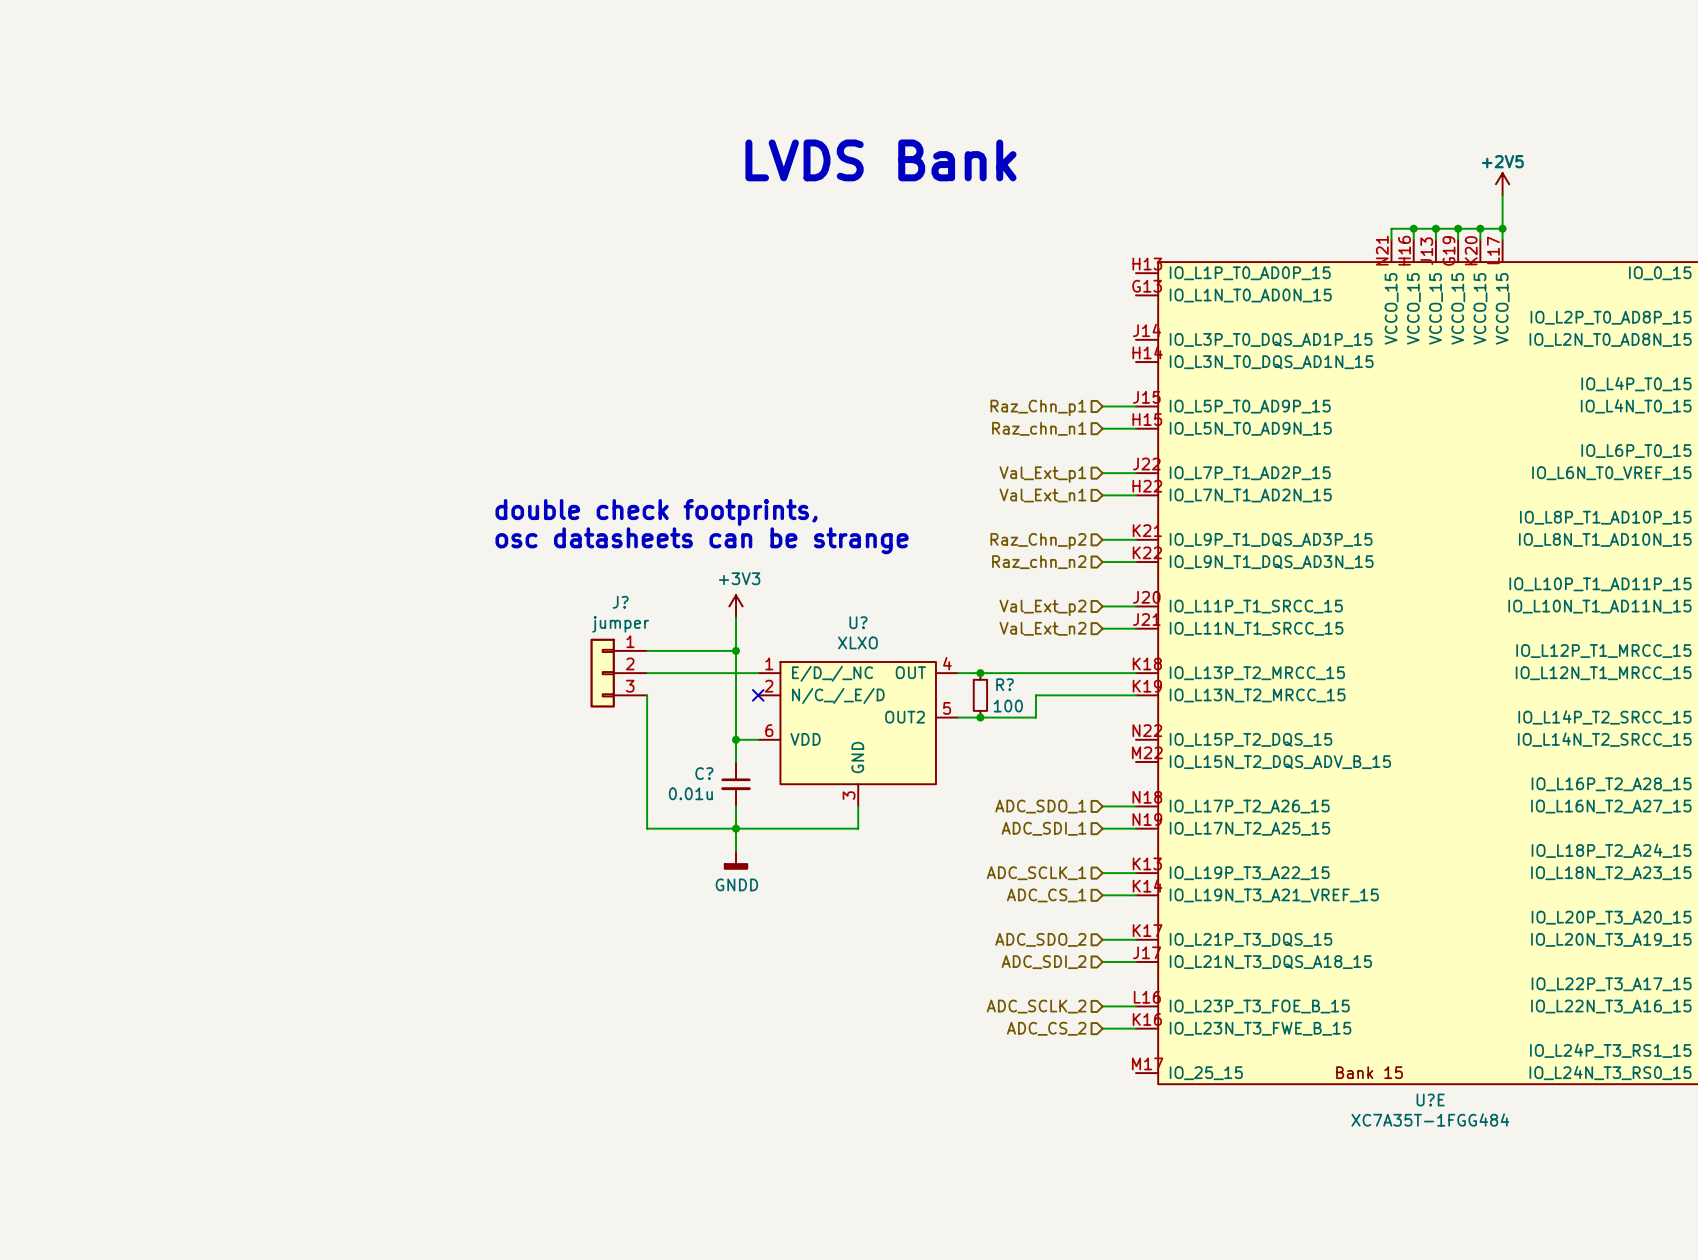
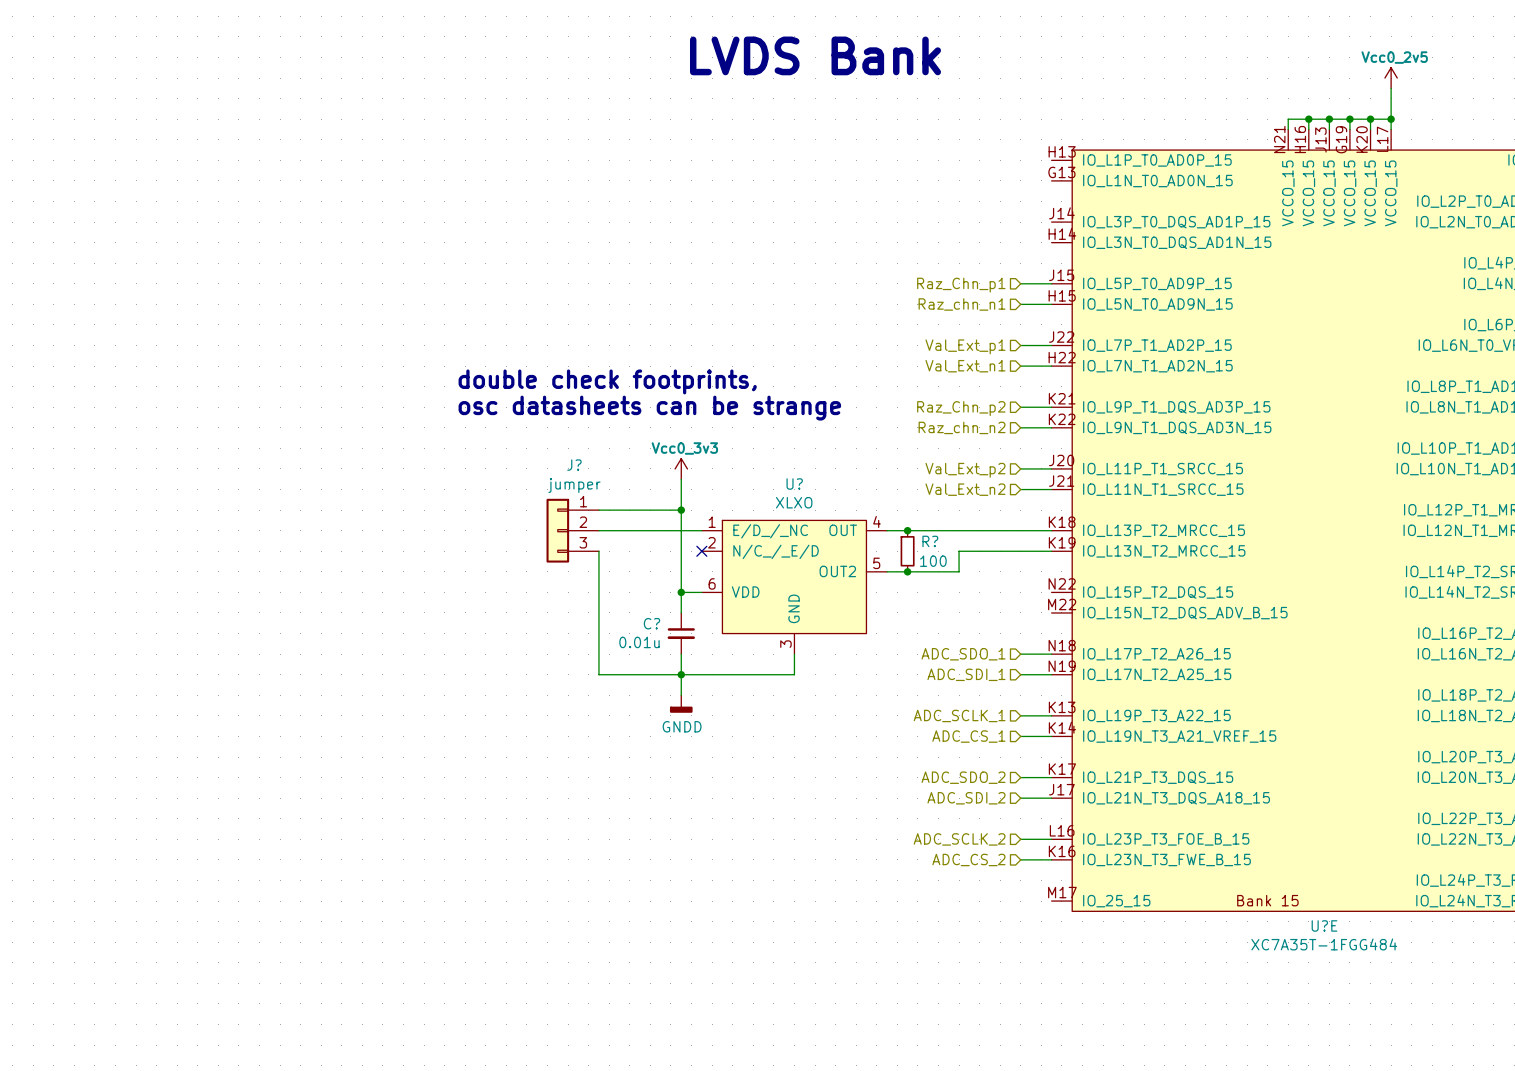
power symbol: +2V5 (1502, 184) -> none
part: none -> Vcc0_2v5 (1391, 78)
power symbol: +3V3 (736, 606) -> none
part: none -> Vcc0_3v3 (681, 468)

